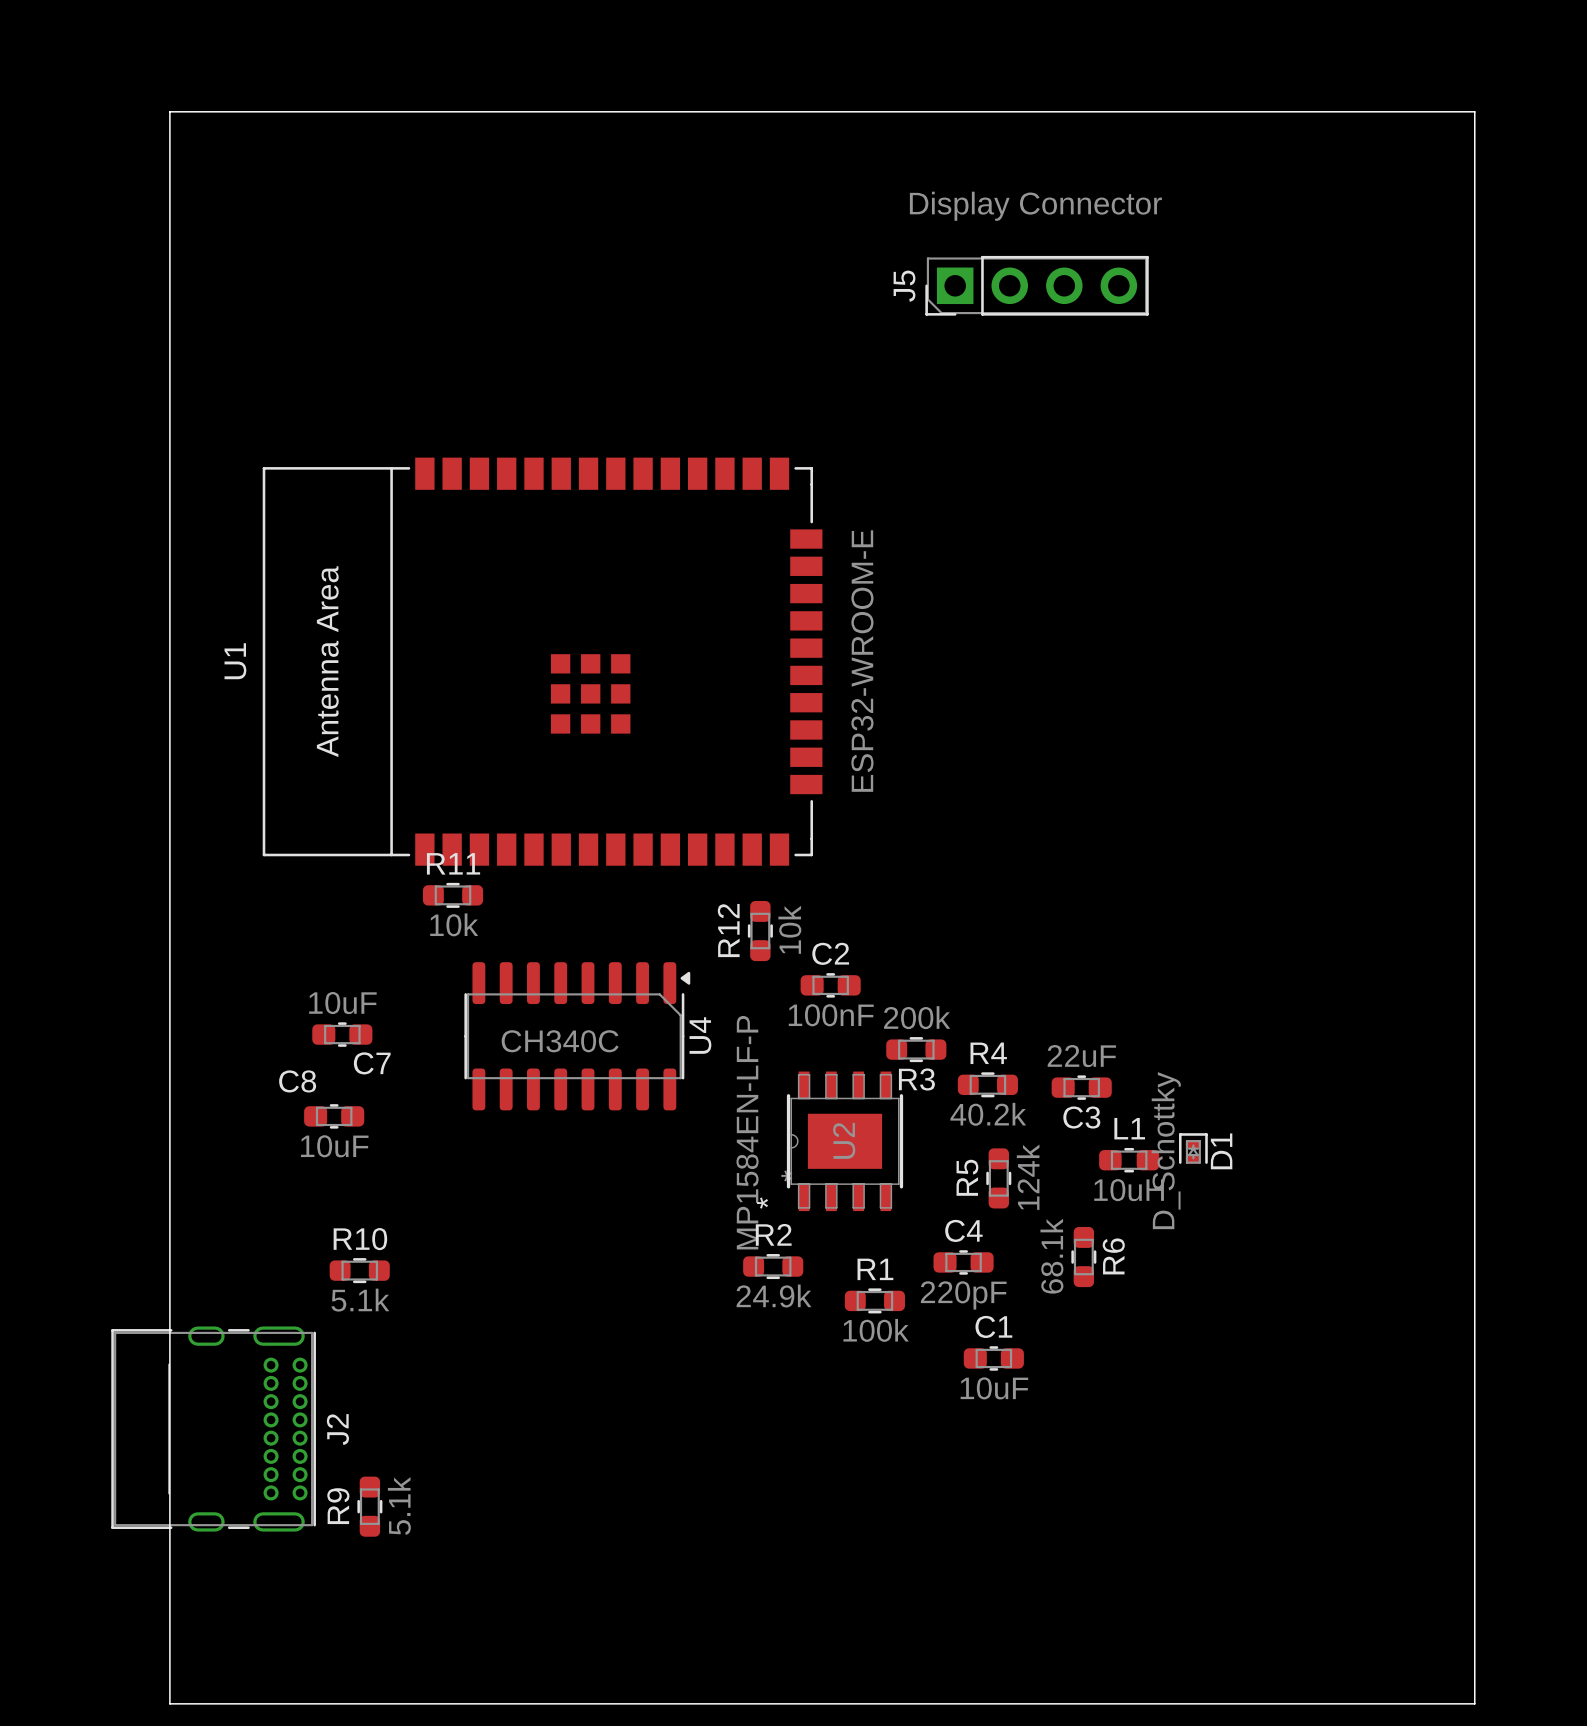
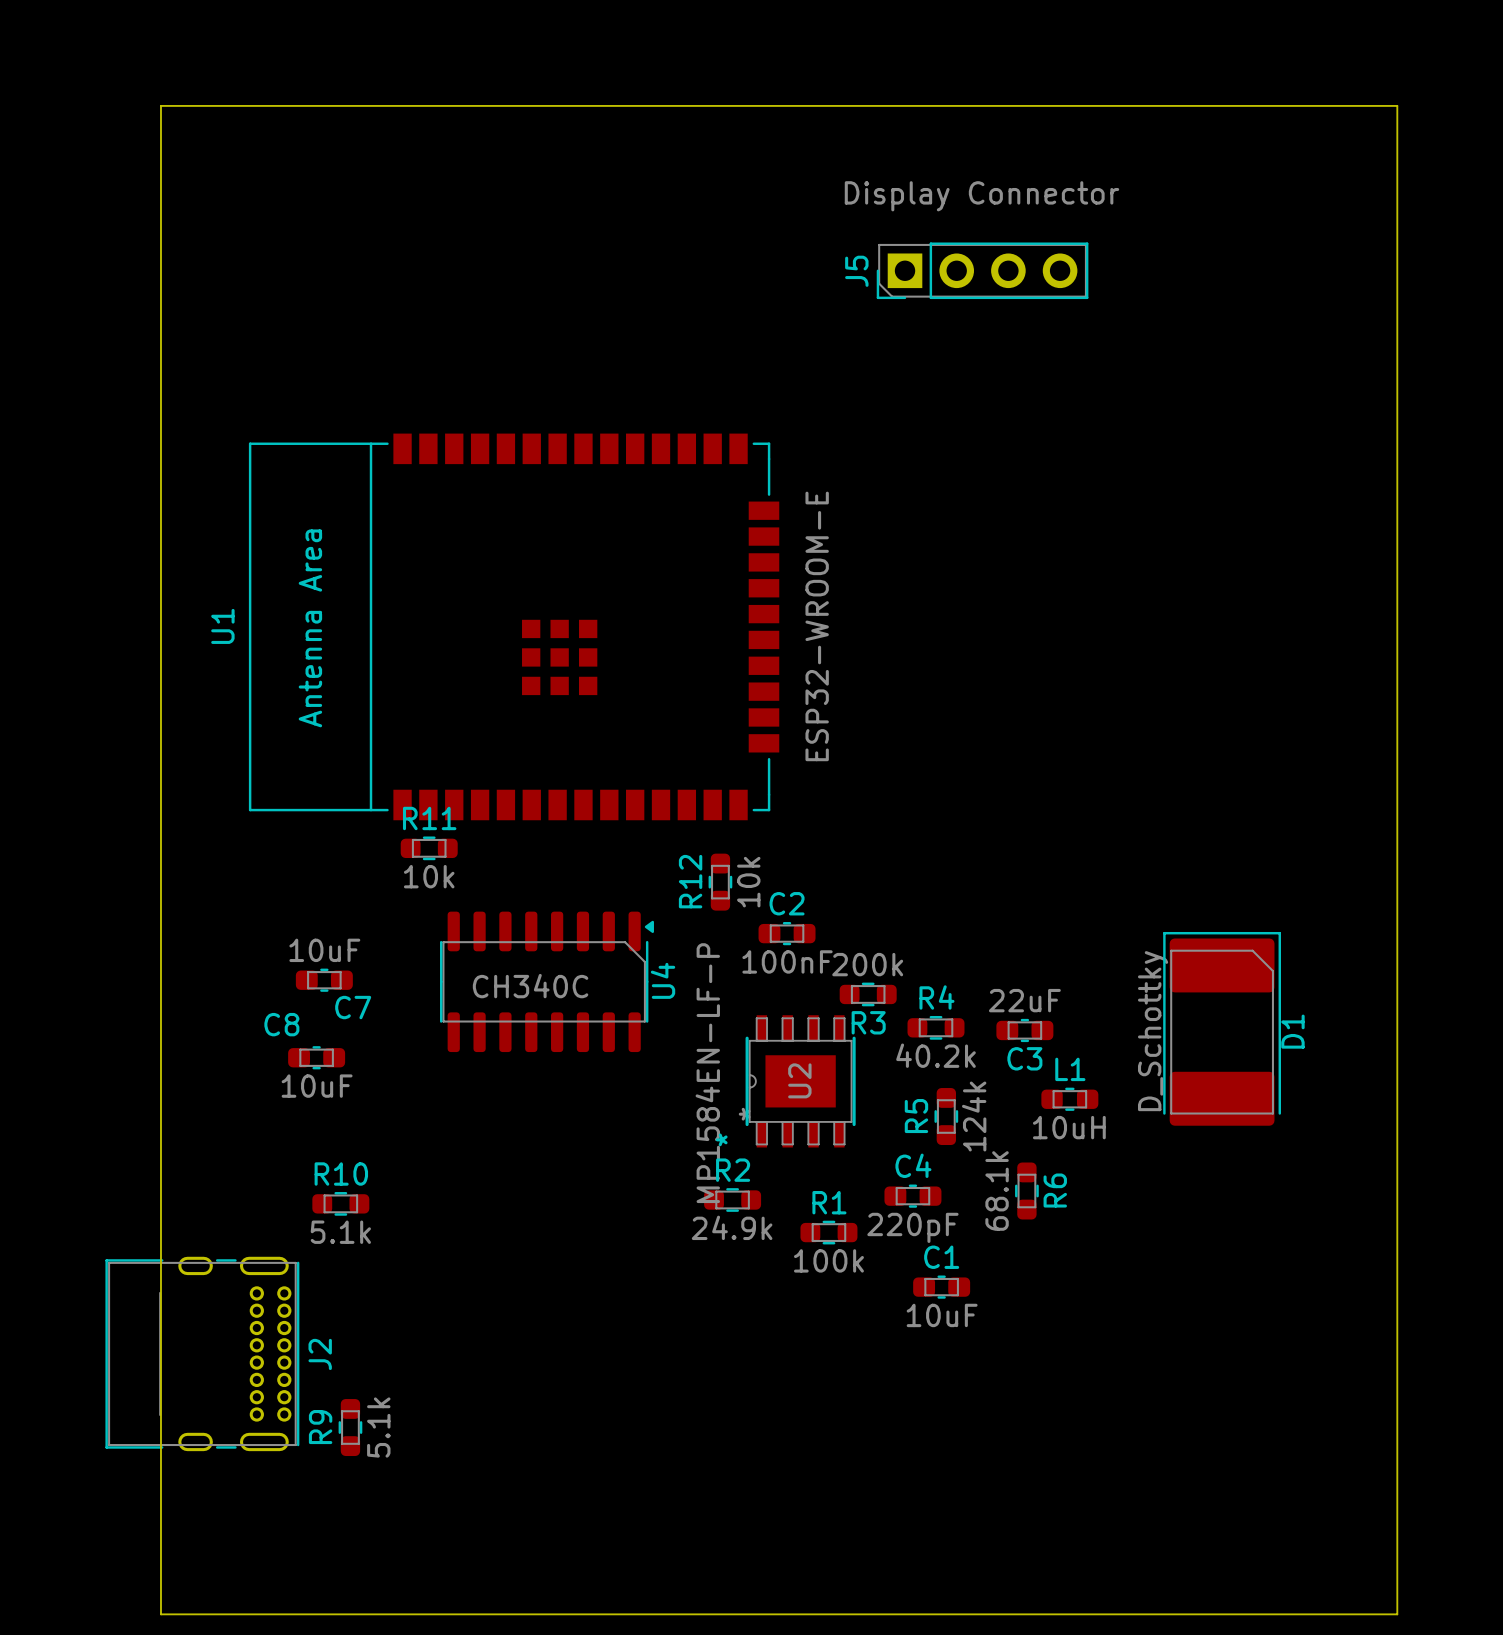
D1 footprint: [1179, 1133, 1208, 1164] -> [1163, 931, 1282, 1126]
D1 value position: D_Schottky (1166, 1150) -> D_Schottky (1153, 1031)
D1 name position: D1 (1221, 1151) -> D1 (1292, 1031)

